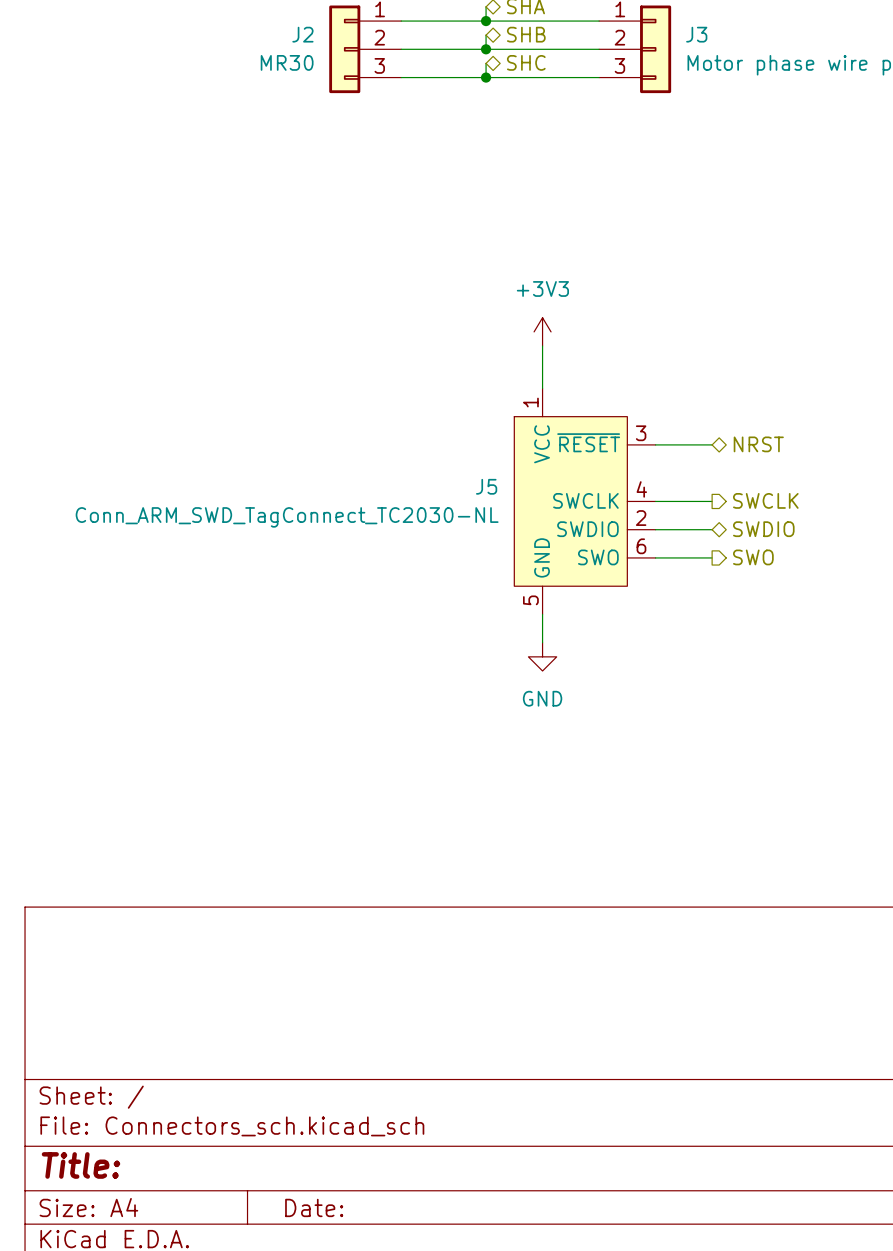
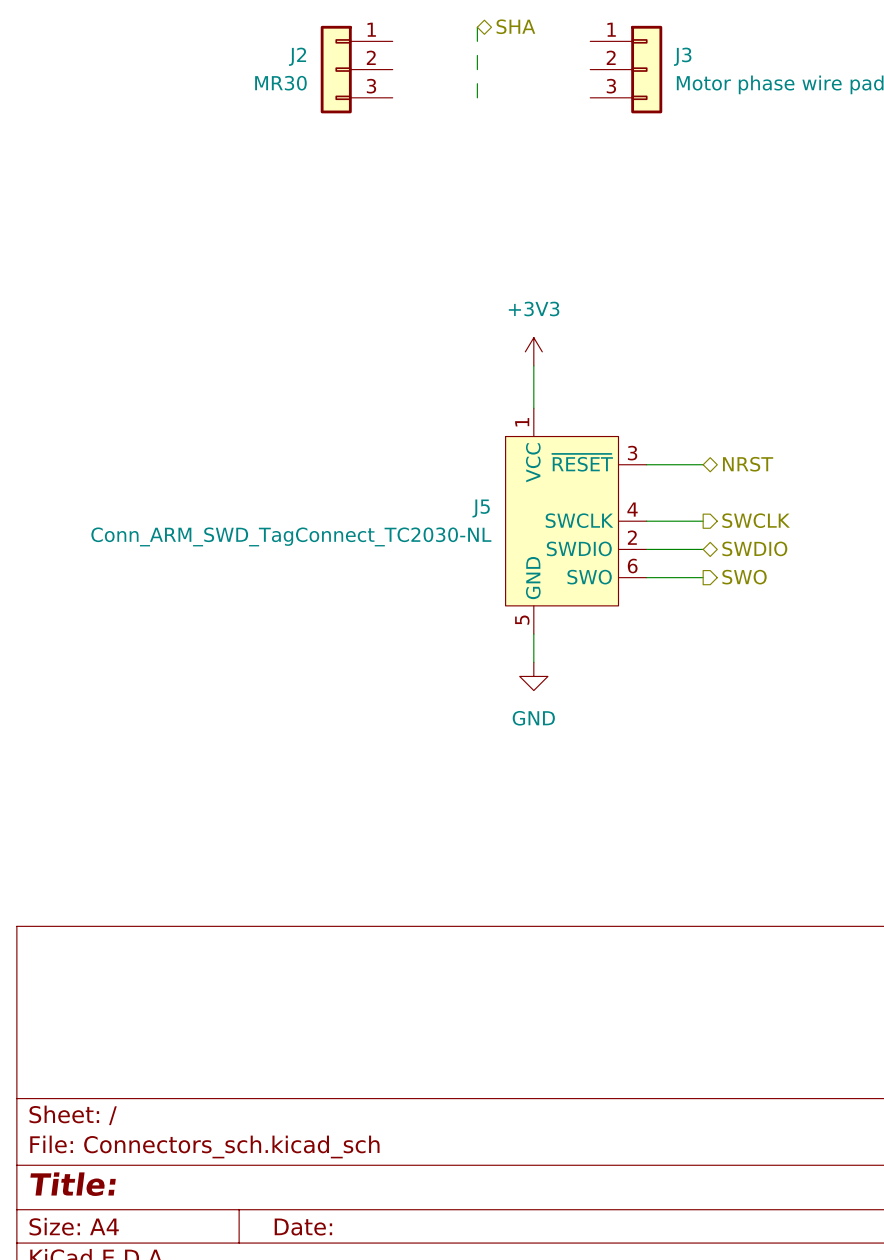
wire: (401, 21) (599, 21) -> none
junction: (486, 21) -> none
hierarchical label: SHB (526, 34) -> none
wire: (401, 49) (599, 49) -> none
junction: (486, 49) -> none
hierarchical label: SHC (526, 62) -> none
wire: (401, 77) (599, 77) -> none
junction: (486, 77) -> none

